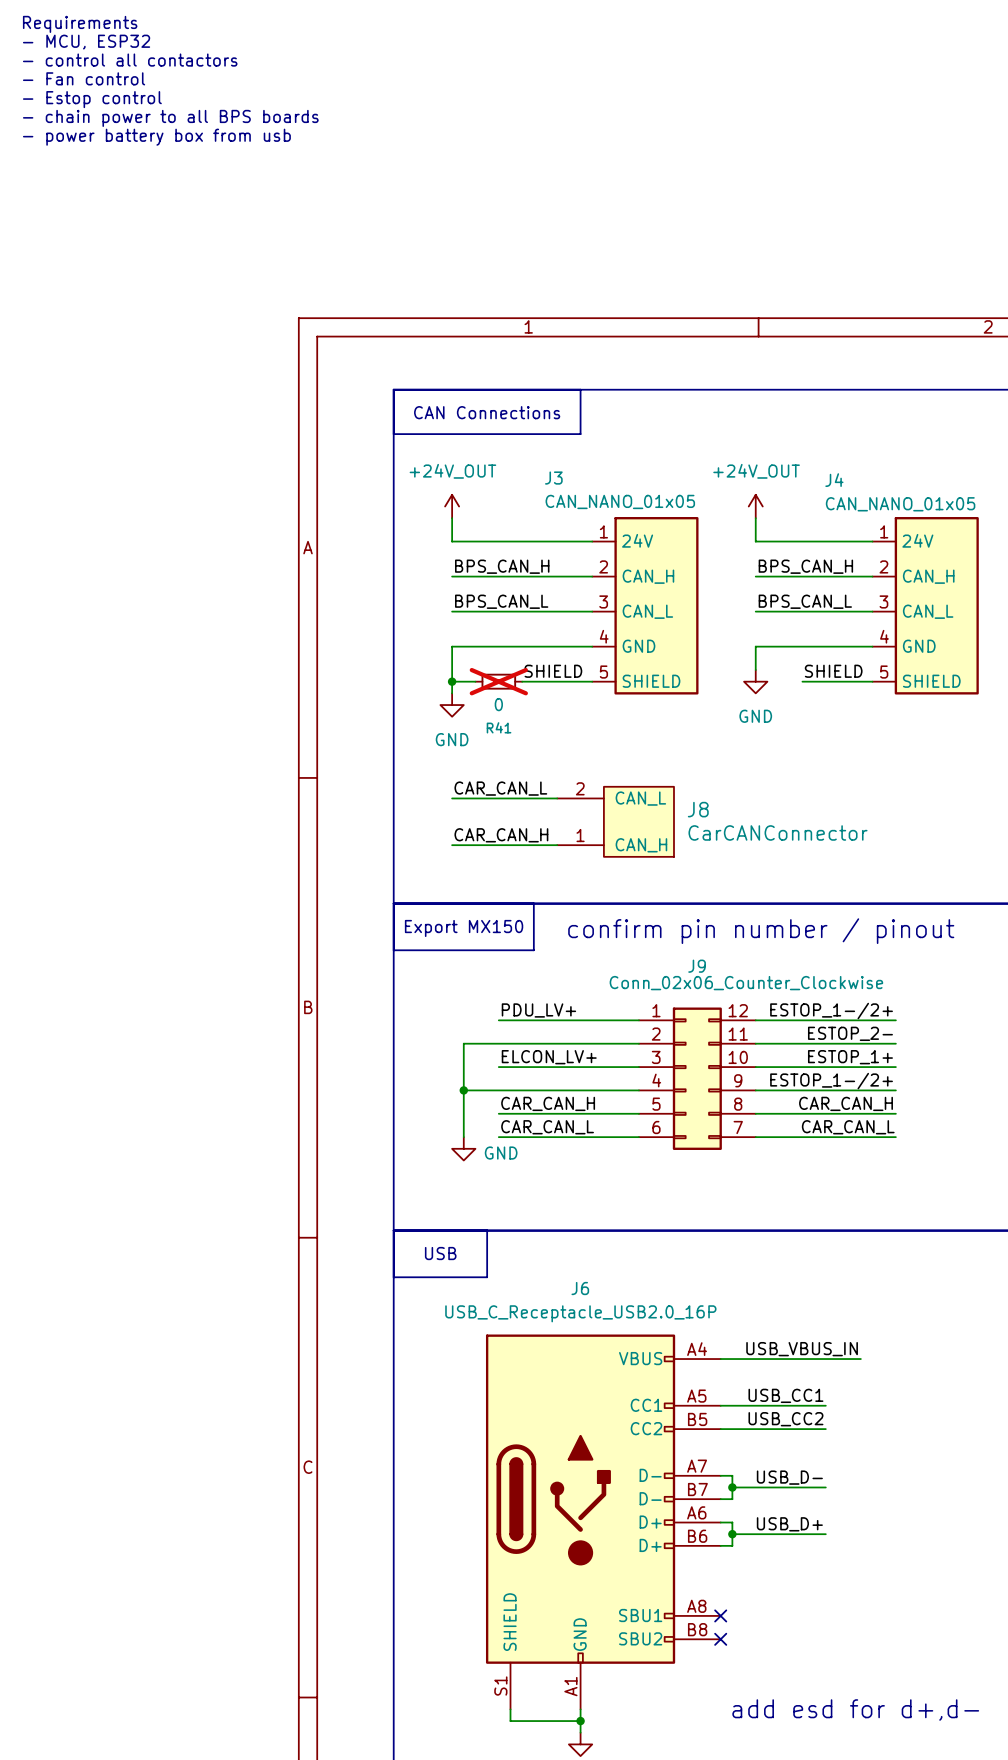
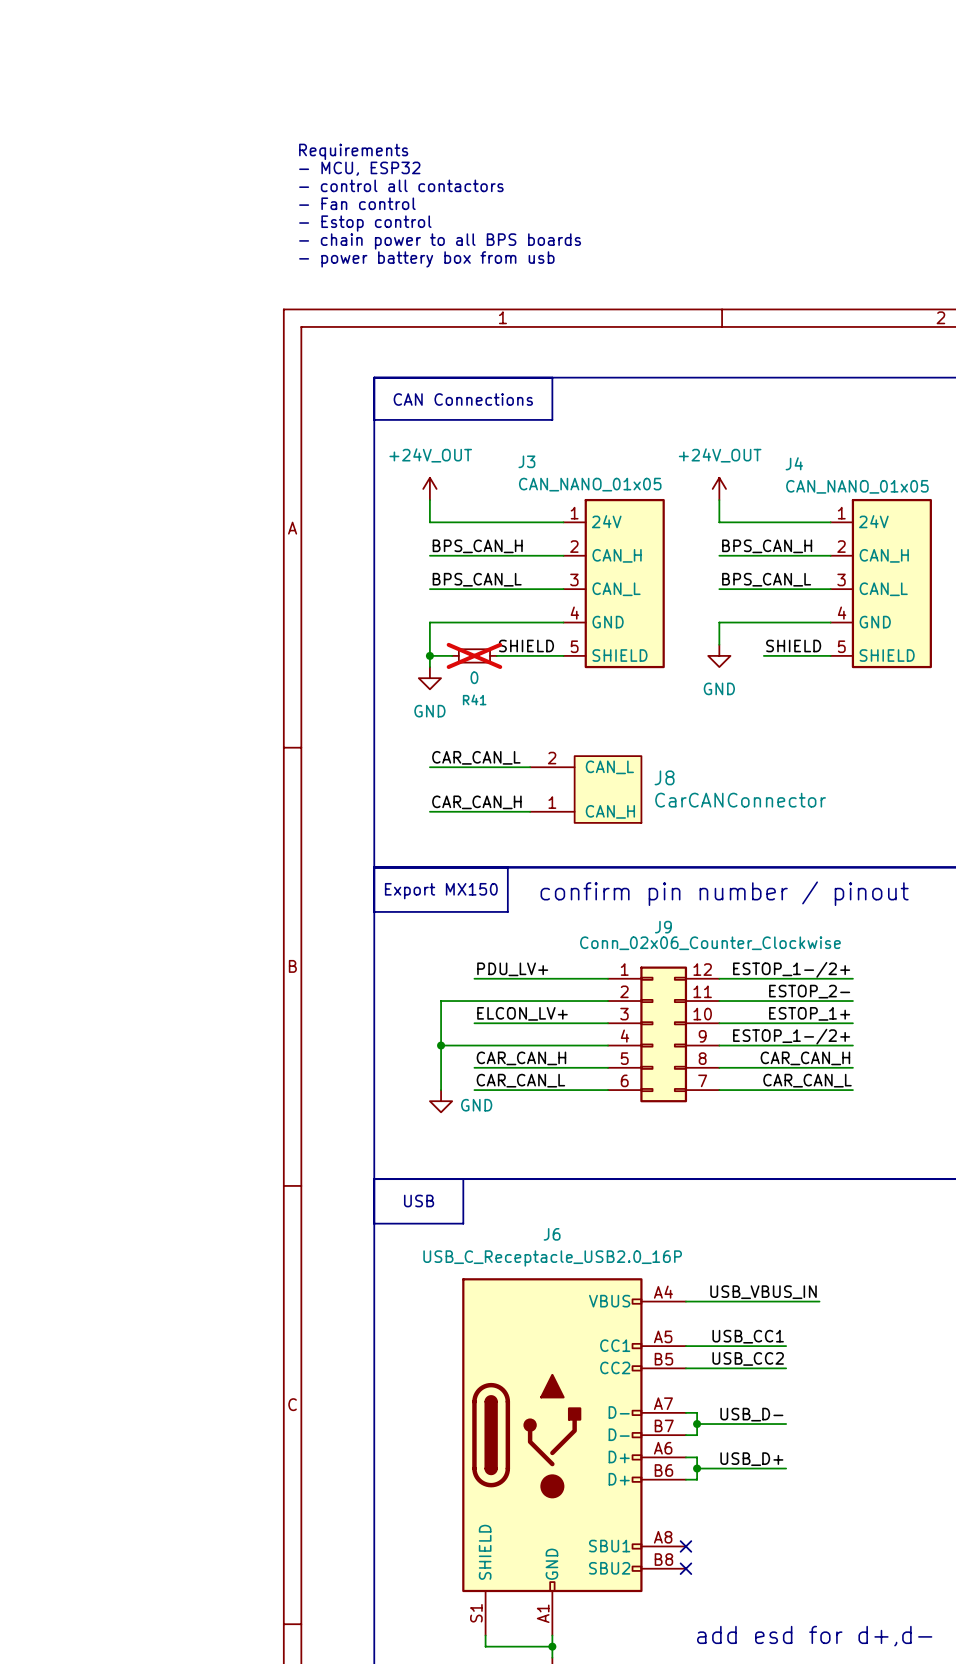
text: Requirements (80, 24) -> none
text: - MCU, ESP32 (86, 42) -> none
text: - control all contactors (130, 60) -> none
text: - Fan control (84, 78) -> none
text: - Estop control (92, 99) -> none
text: - chain power to all BPS boards (170, 118) -> none
text: - power battery box from usb (156, 137) -> none
text: none -> Requirements (353, 151)
text: none -> - MCU, ESP32 (359, 168)
text: none -> - control all contactors (401, 185)
text: none -> - Fan control (357, 203)
text: none -> - Estop control (365, 223)
text: none -> - chain power to all BPS boards (440, 241)
text: none -> - power battery box from usb (426, 259)

